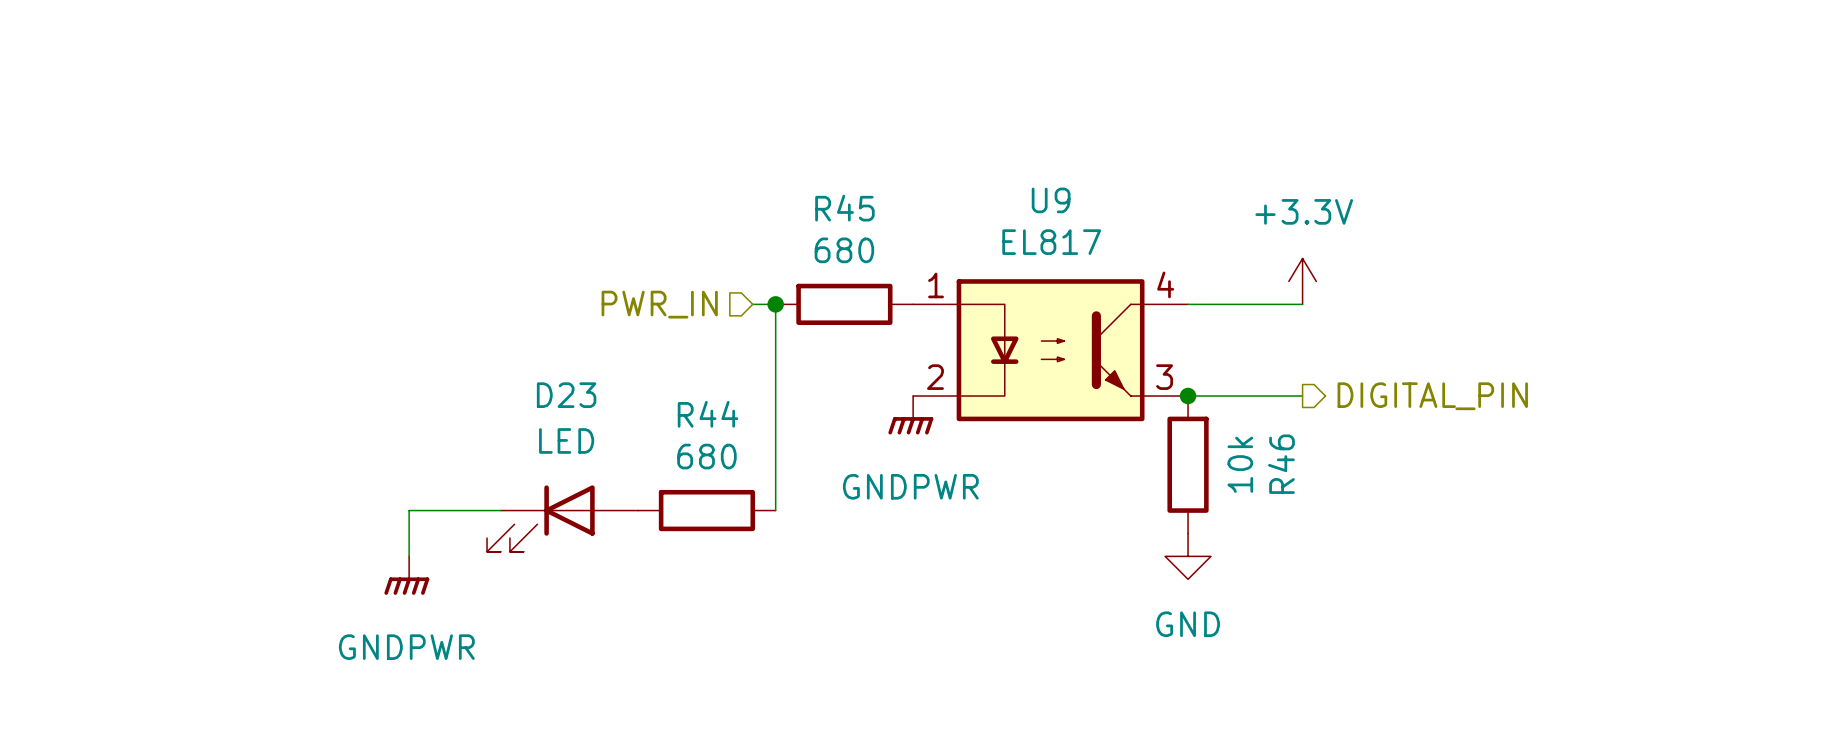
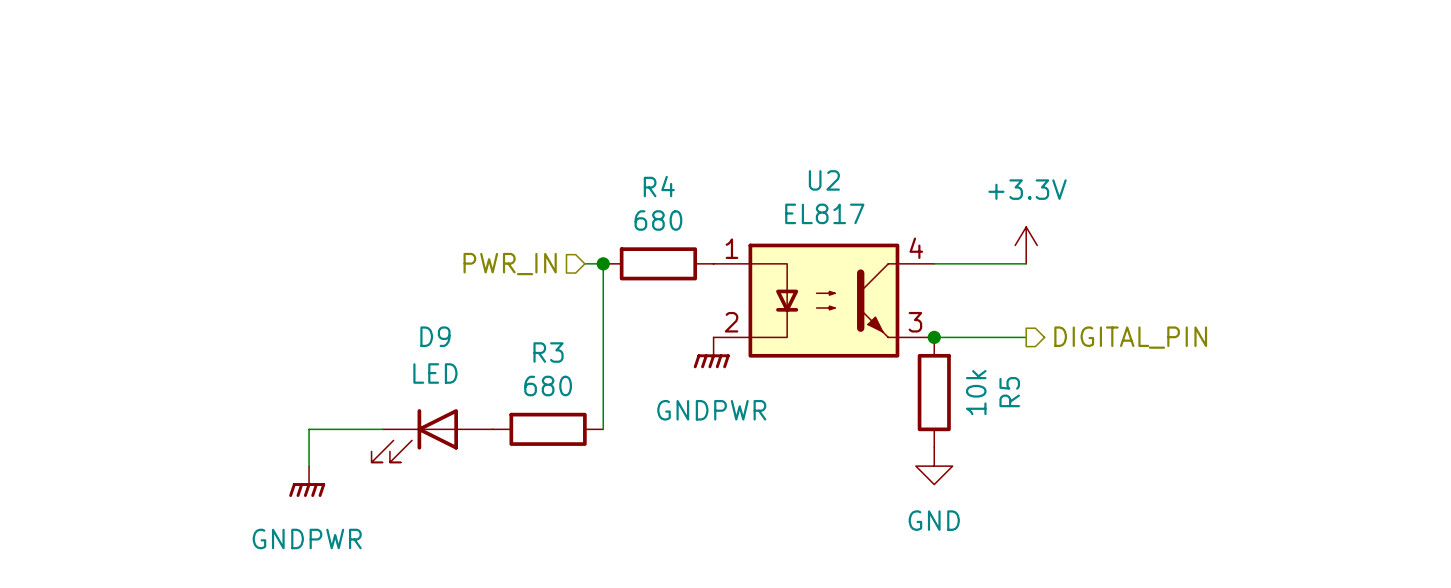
U9 name: U9 (1051, 200) -> U2 (824, 180)
R45 name: R45 (844, 208) -> R4 (659, 186)
D23 name: D23 (566, 395) -> D9 (435, 336)
R44 name: R44 (708, 414) -> R3 (548, 352)
R46 name: R46 (1281, 464) -> R5 (1009, 392)

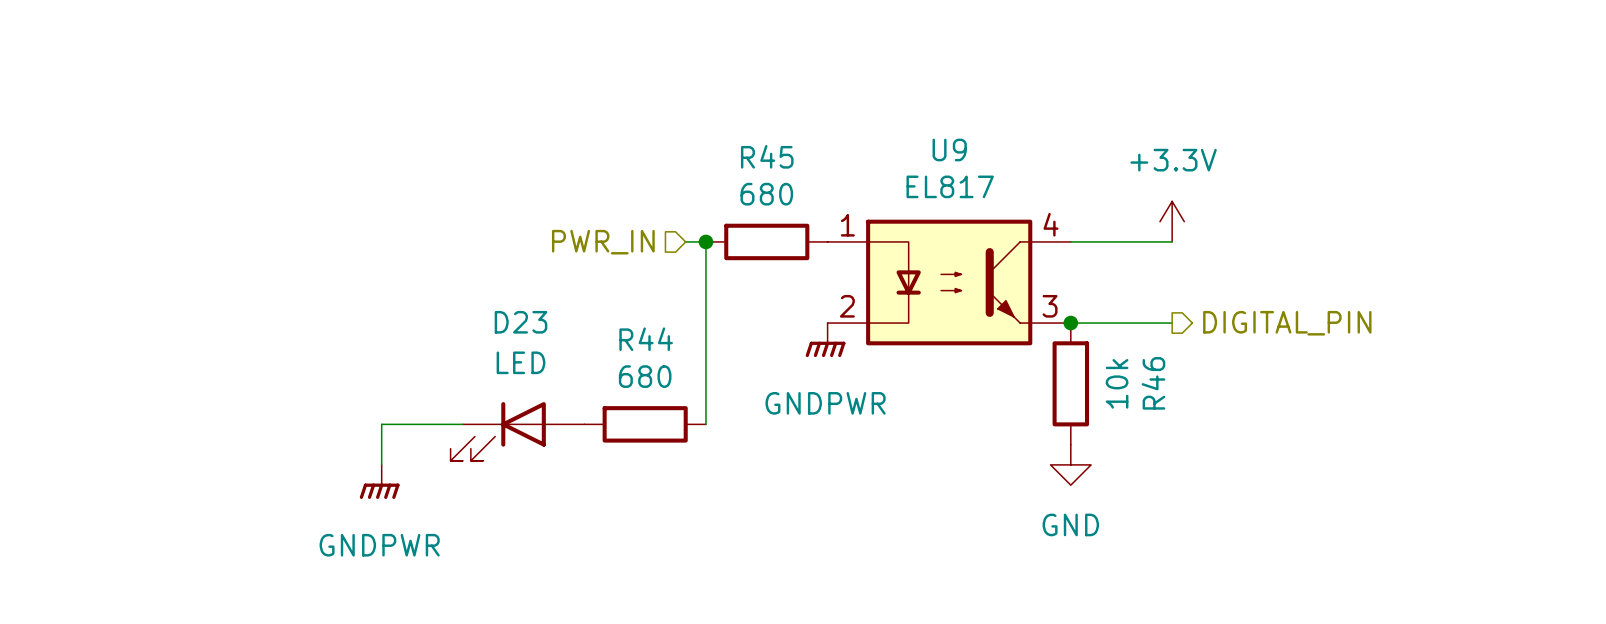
U2 name: U2 (824, 180) -> U9 (949, 149)
R4 name: R4 (659, 186) -> R45 (767, 156)
D9 name: D9 (435, 336) -> D23 (521, 322)
R3 name: R3 (548, 352) -> R44 (646, 339)
R5 name: R5 (1009, 392) -> R46 (1153, 383)

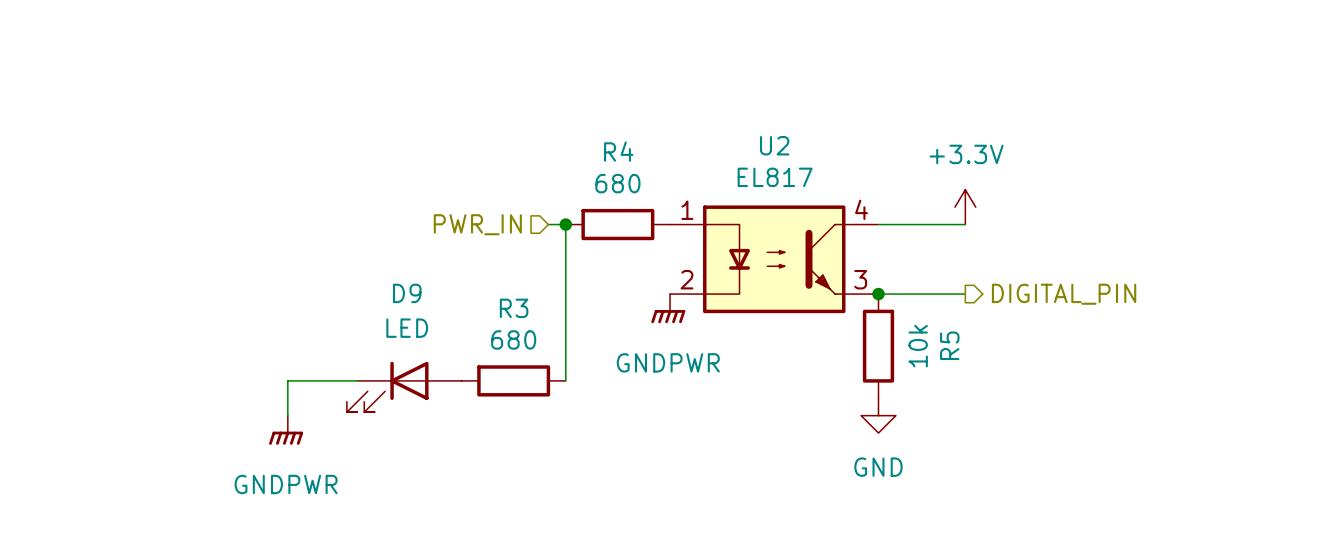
U9 name: U9 (949, 149) -> U2 (774, 145)
R45 name: R45 (767, 156) -> R4 (618, 151)
D23 name: D23 (521, 322) -> D9 (407, 293)
R44 name: R44 (646, 339) -> R3 (514, 308)
R46 name: R46 (1153, 383) -> R5 (949, 345)

